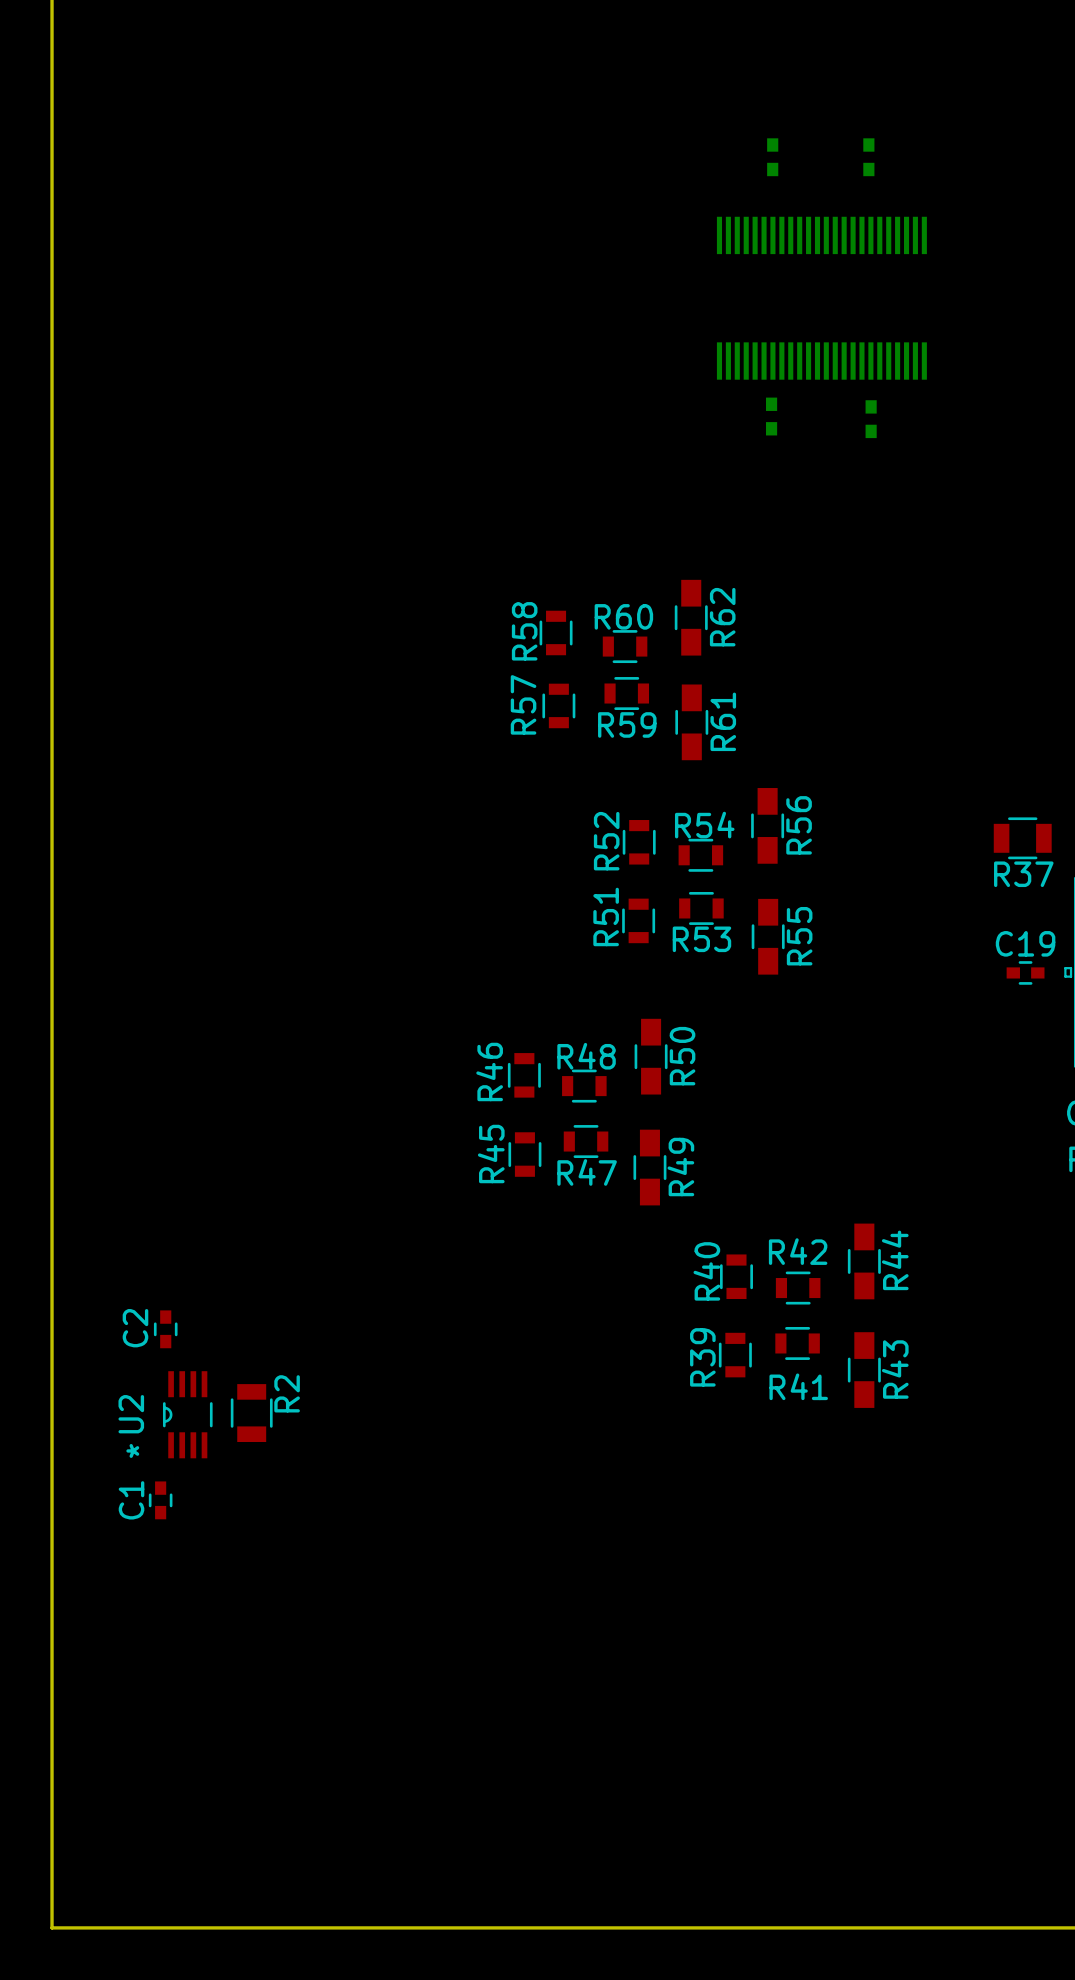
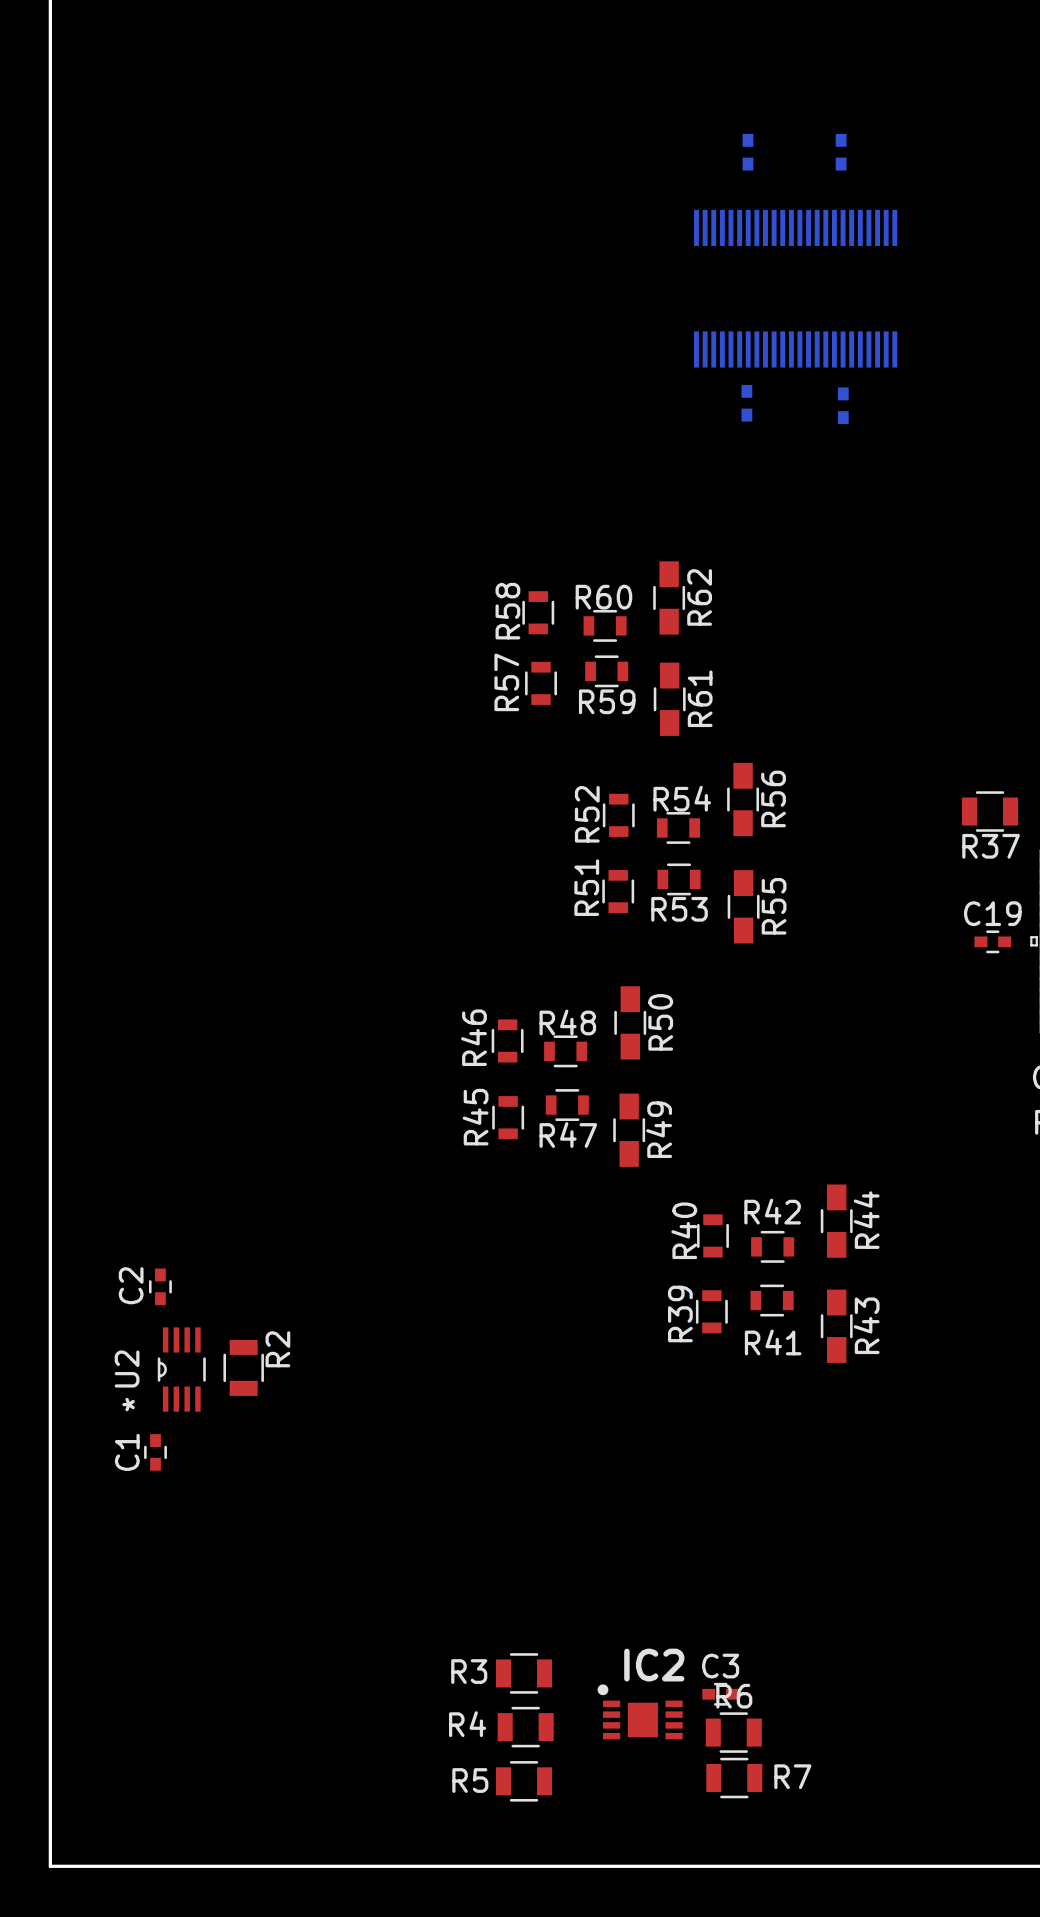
R3: none -> (524, 1673)
C3: none -> (720, 1694)
IC2: none -> (640, 1711)
R4: none -> (525, 1727)
R6: none -> (733, 1732)
R7: none -> (734, 1778)
R5: none -> (524, 1781)

